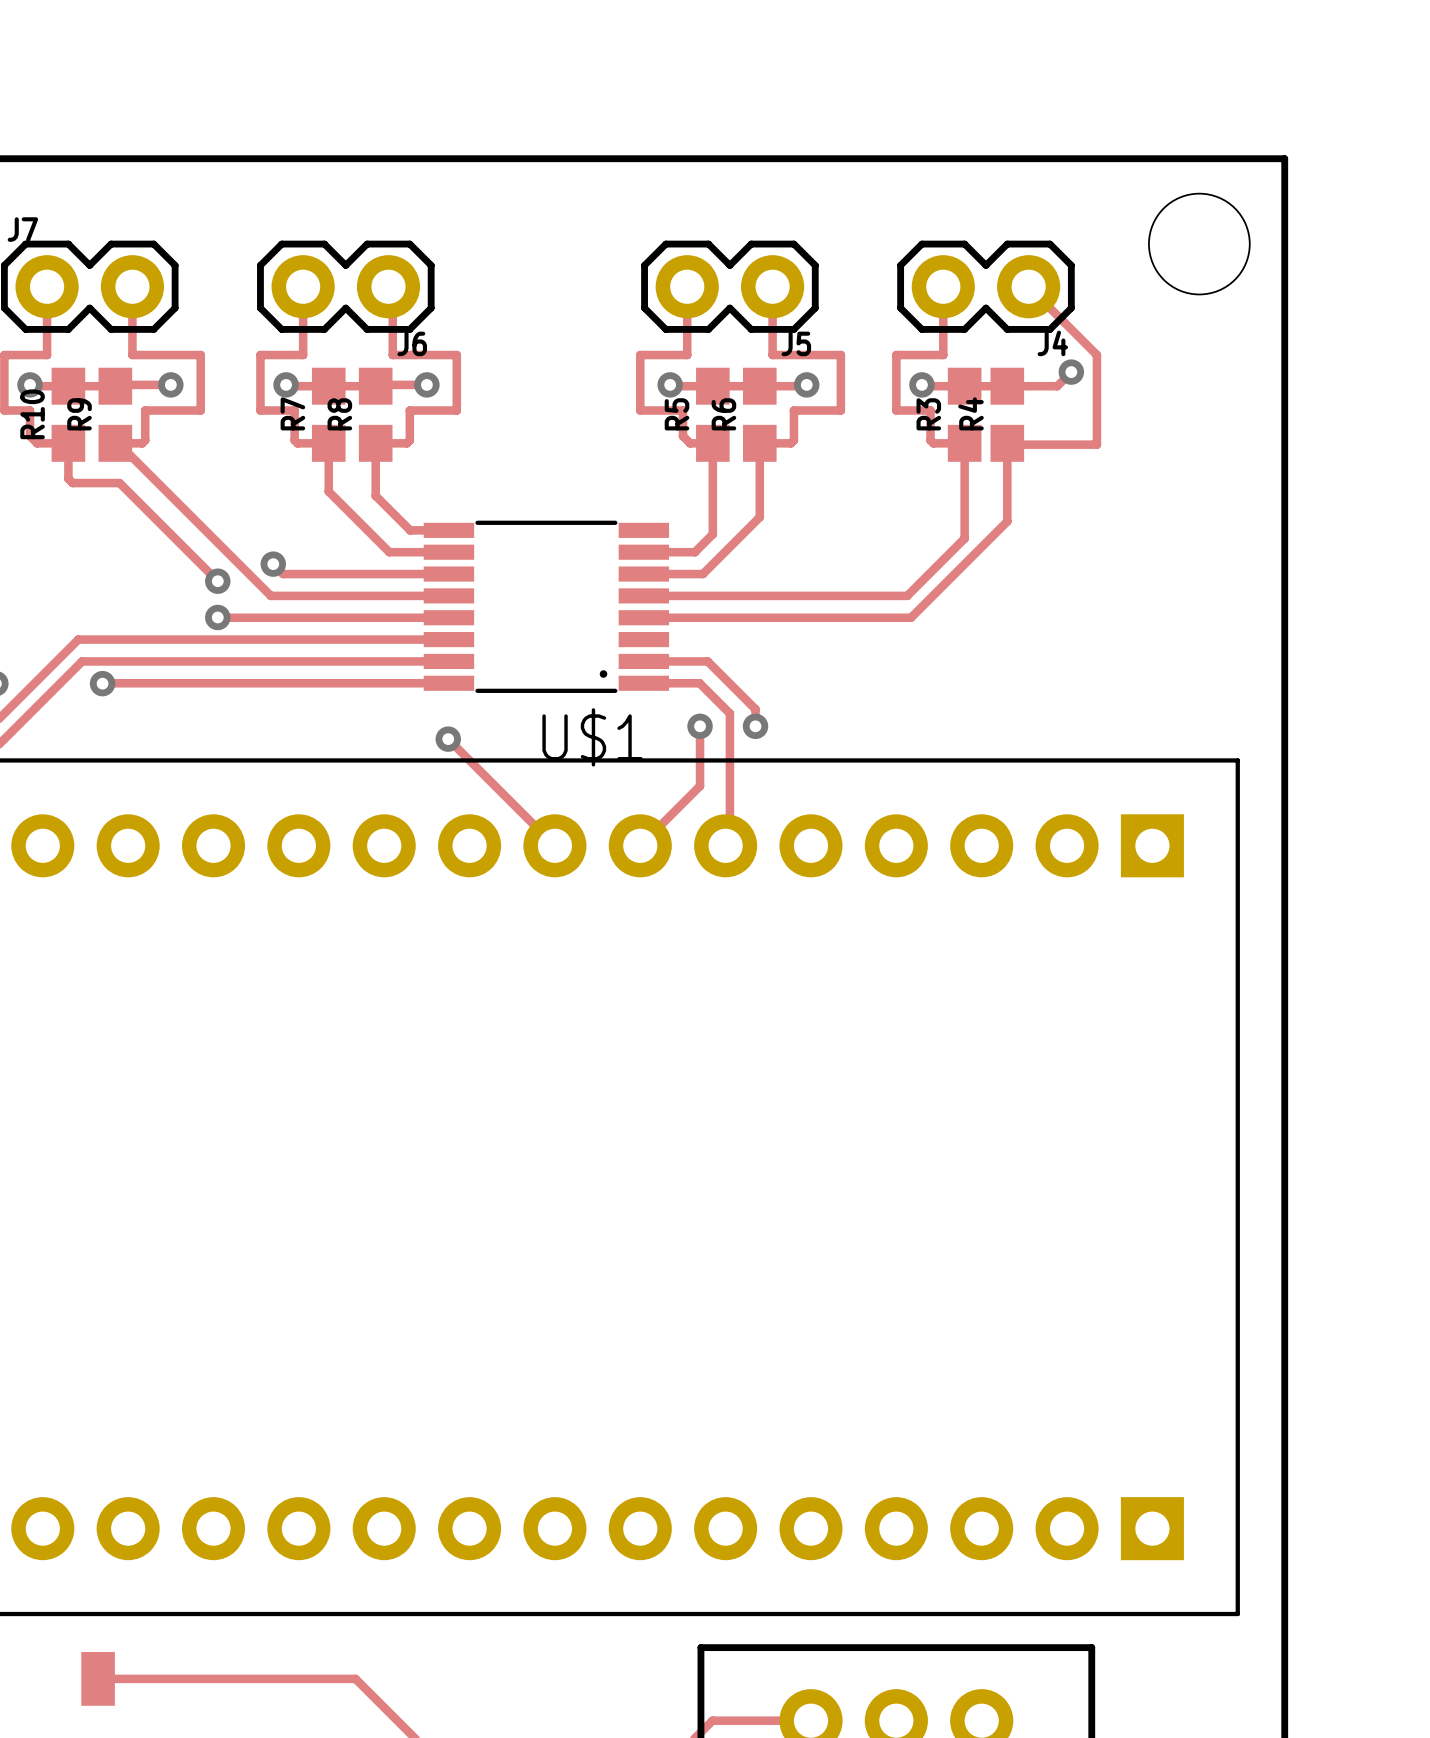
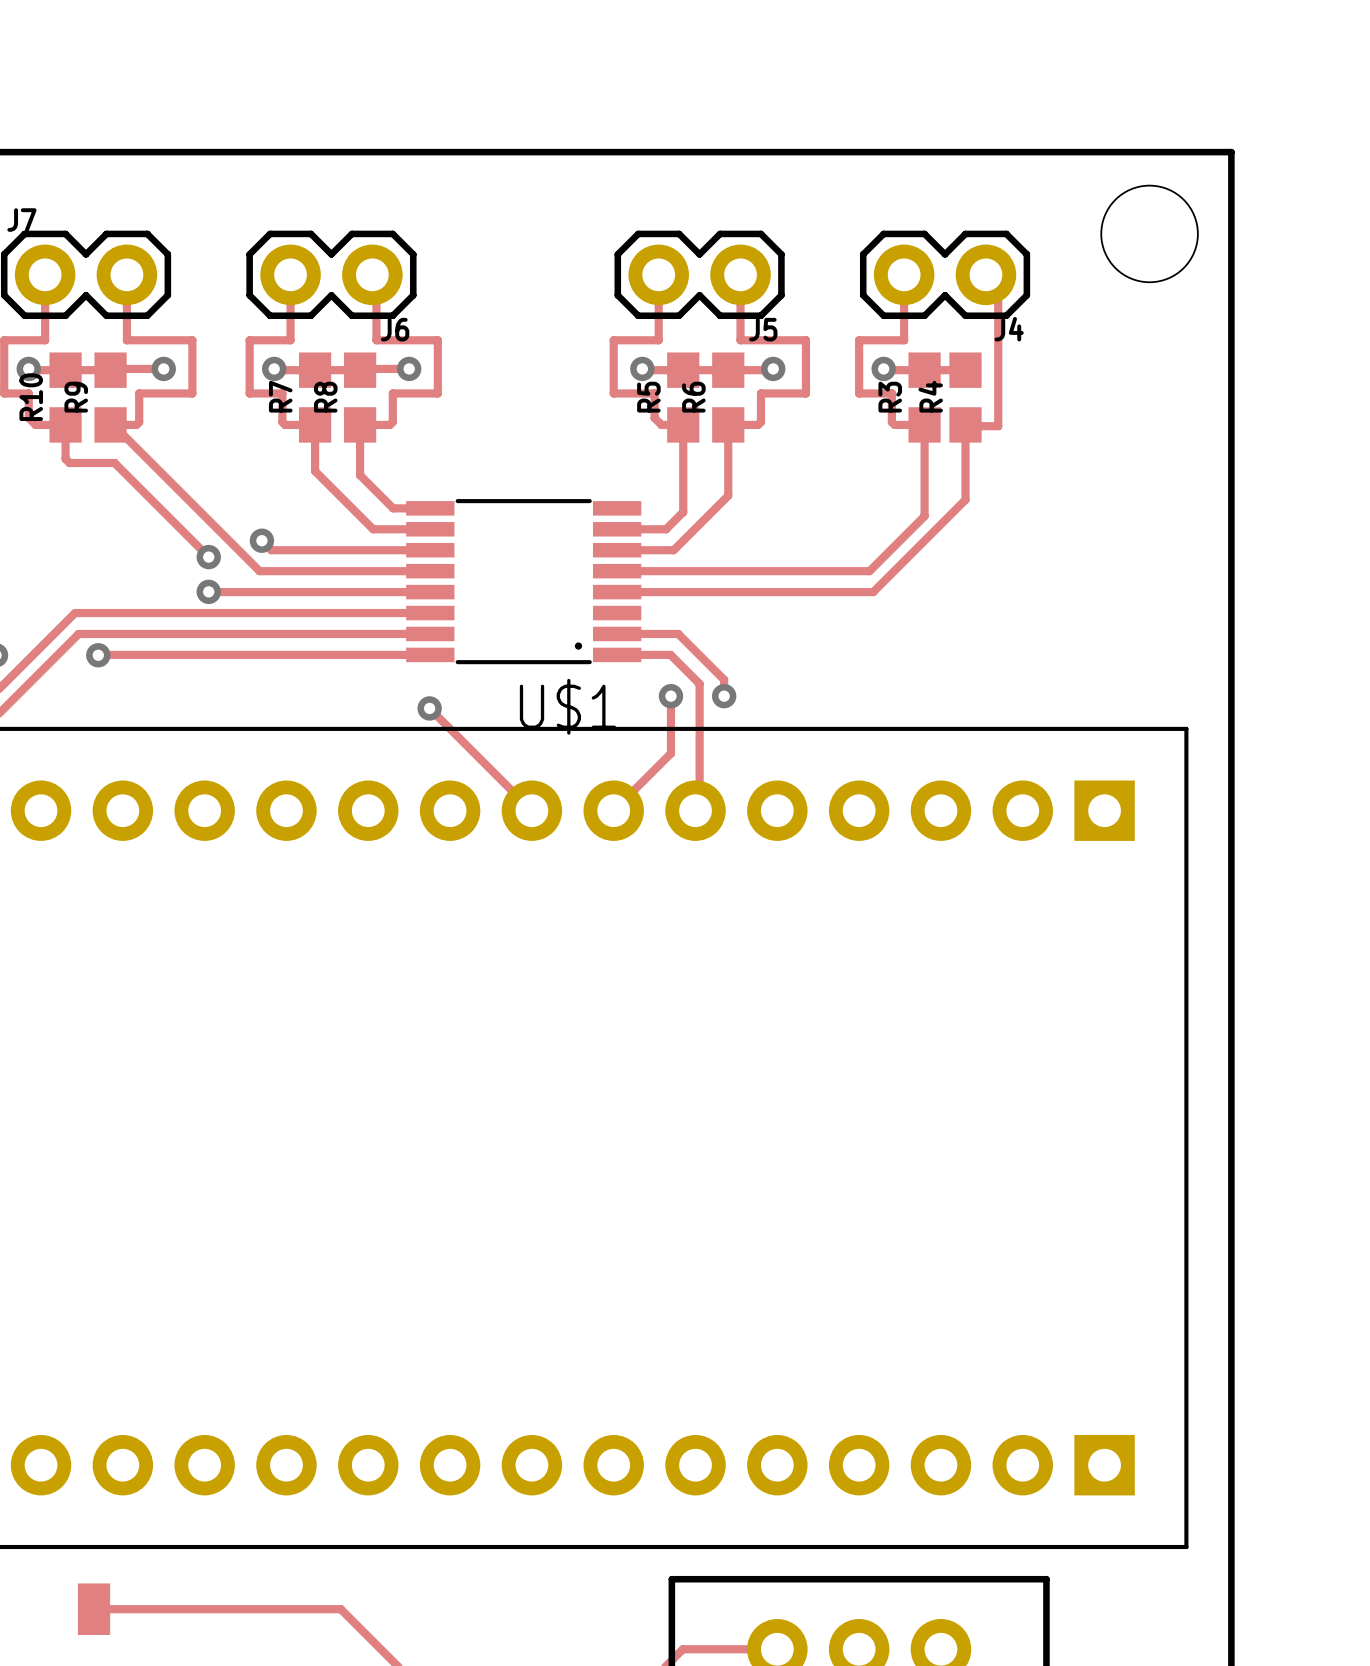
track: (1041, 299) (1096, 355) (1096, 444) (1041, 444) -> (998, 287) (998, 426)
track: (1071, 372) (1057, 386) (1007, 386) -> none
via: (1071, 372) -> none

